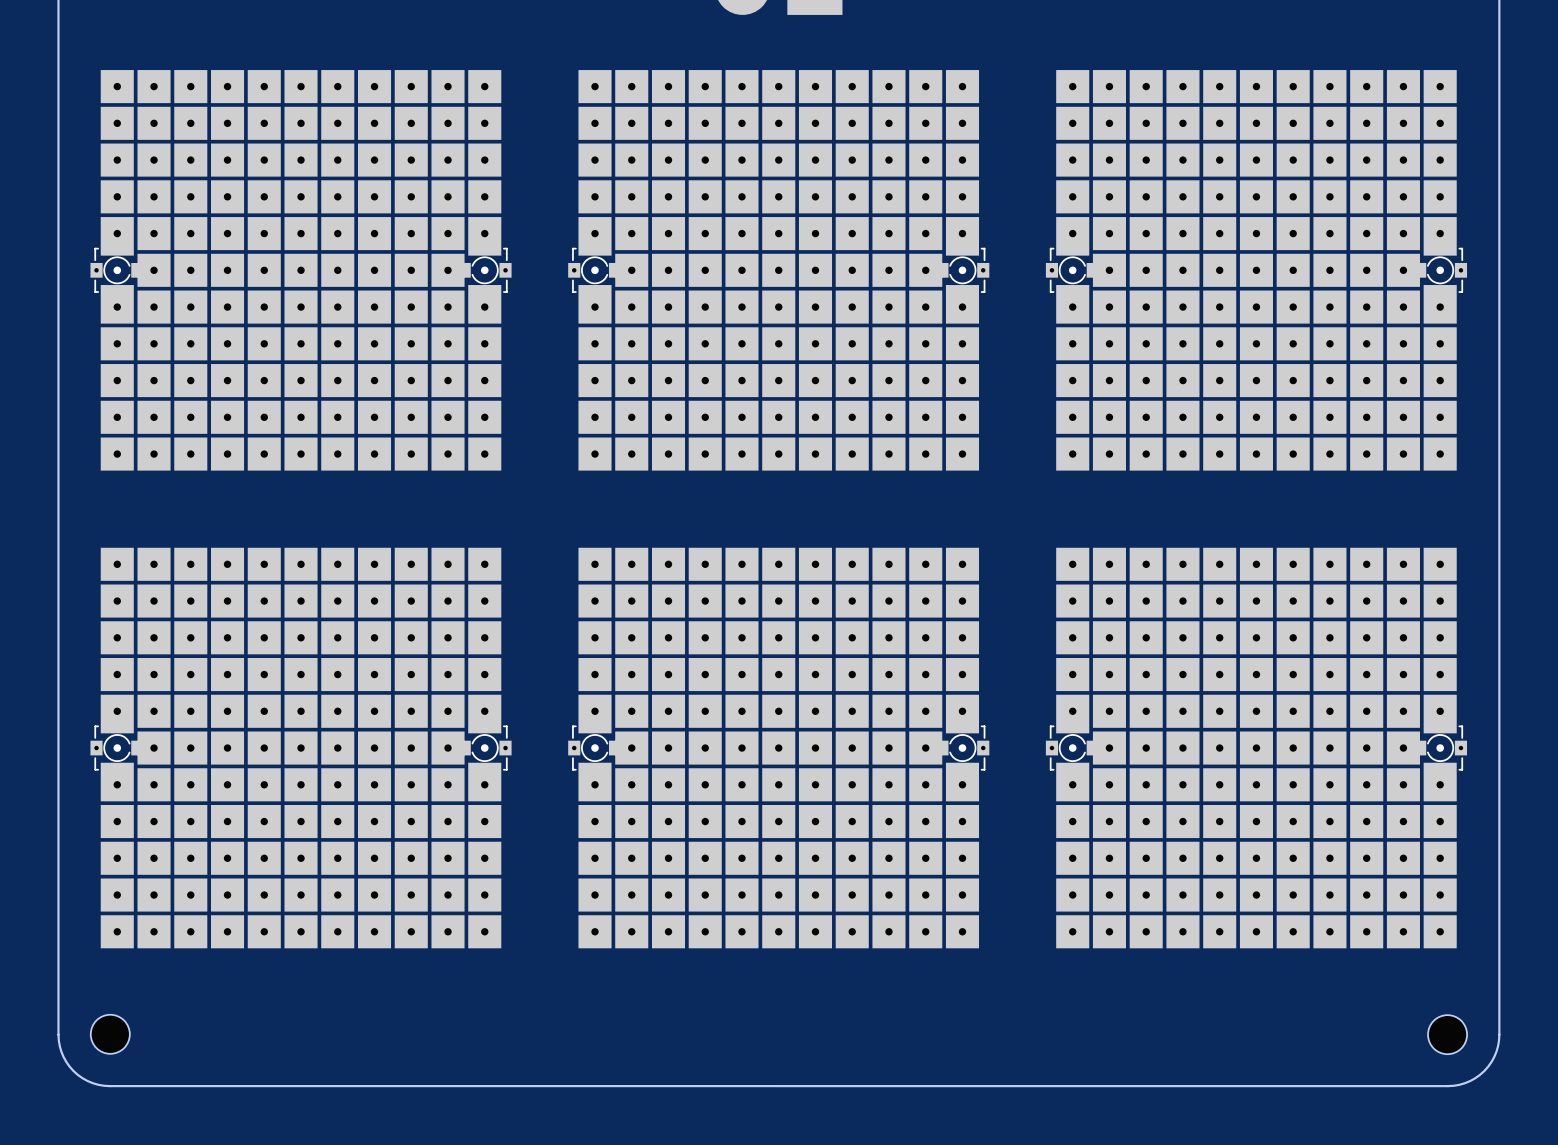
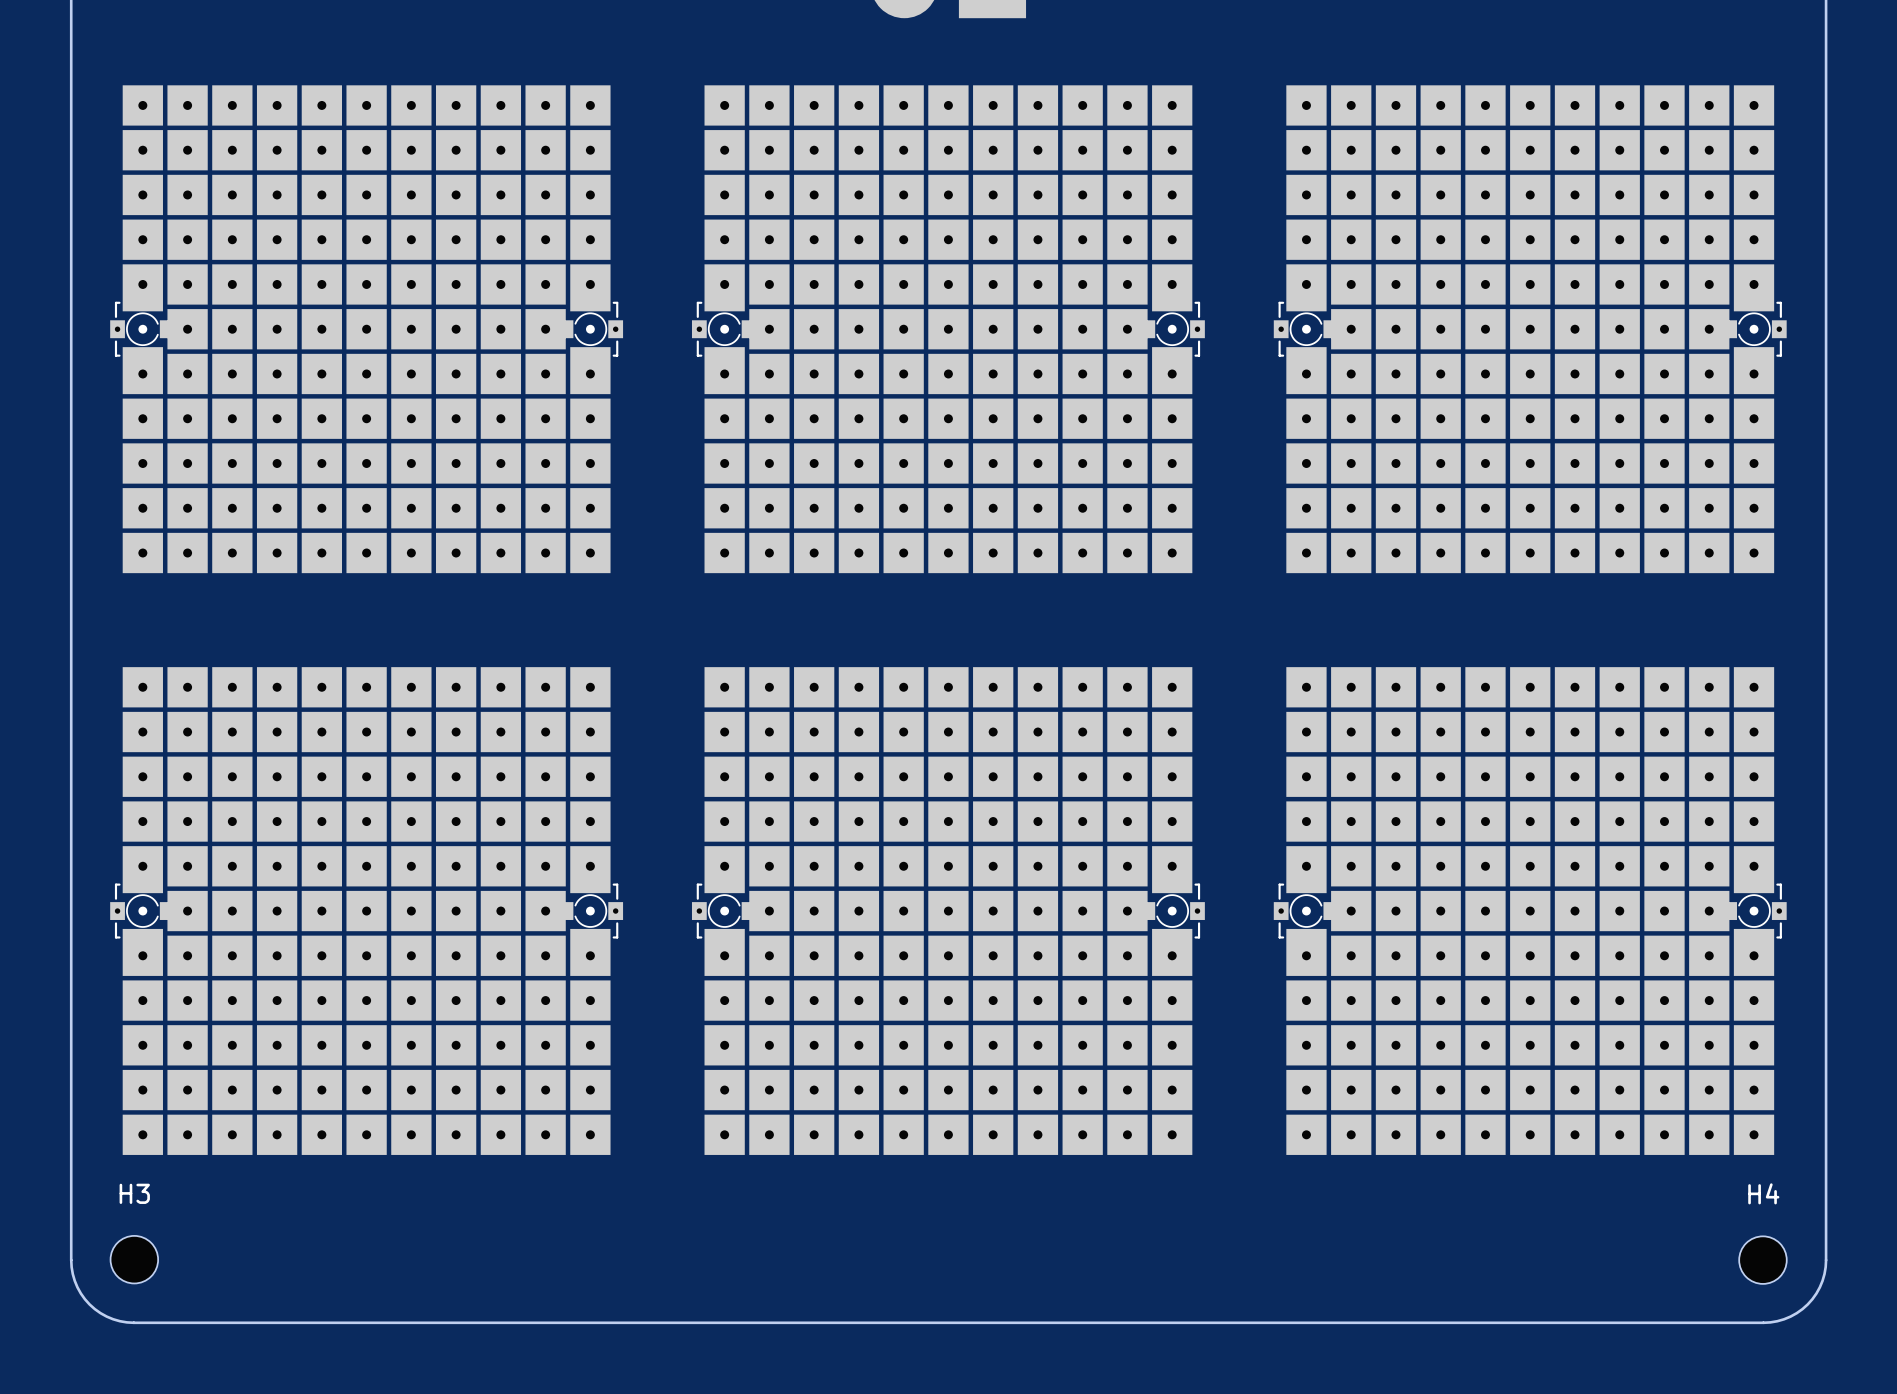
H3 name: none -> H3 (134, 1193)
H4 name: none -> H4 (1763, 1193)

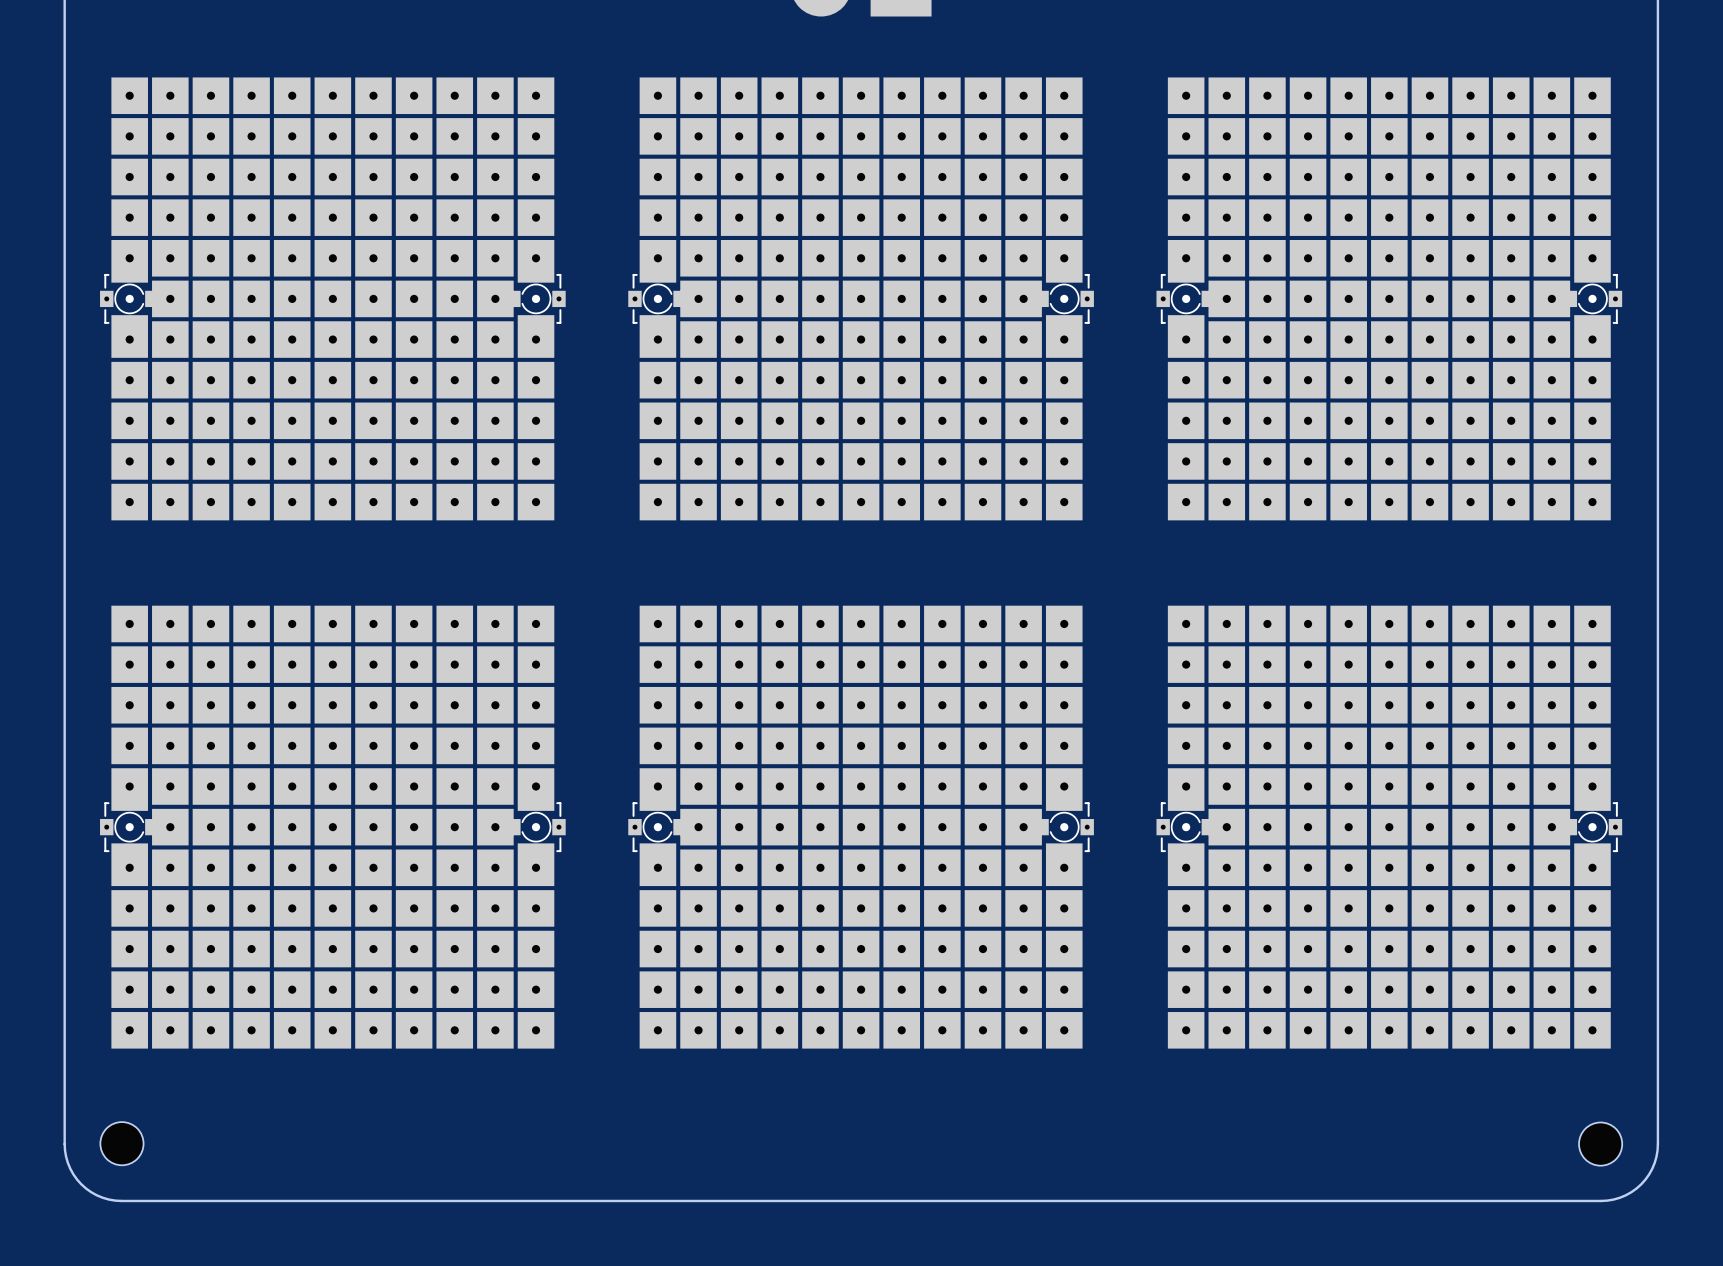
H3 name: H3 (134, 1193) -> none
H4 name: H4 (1763, 1193) -> none

